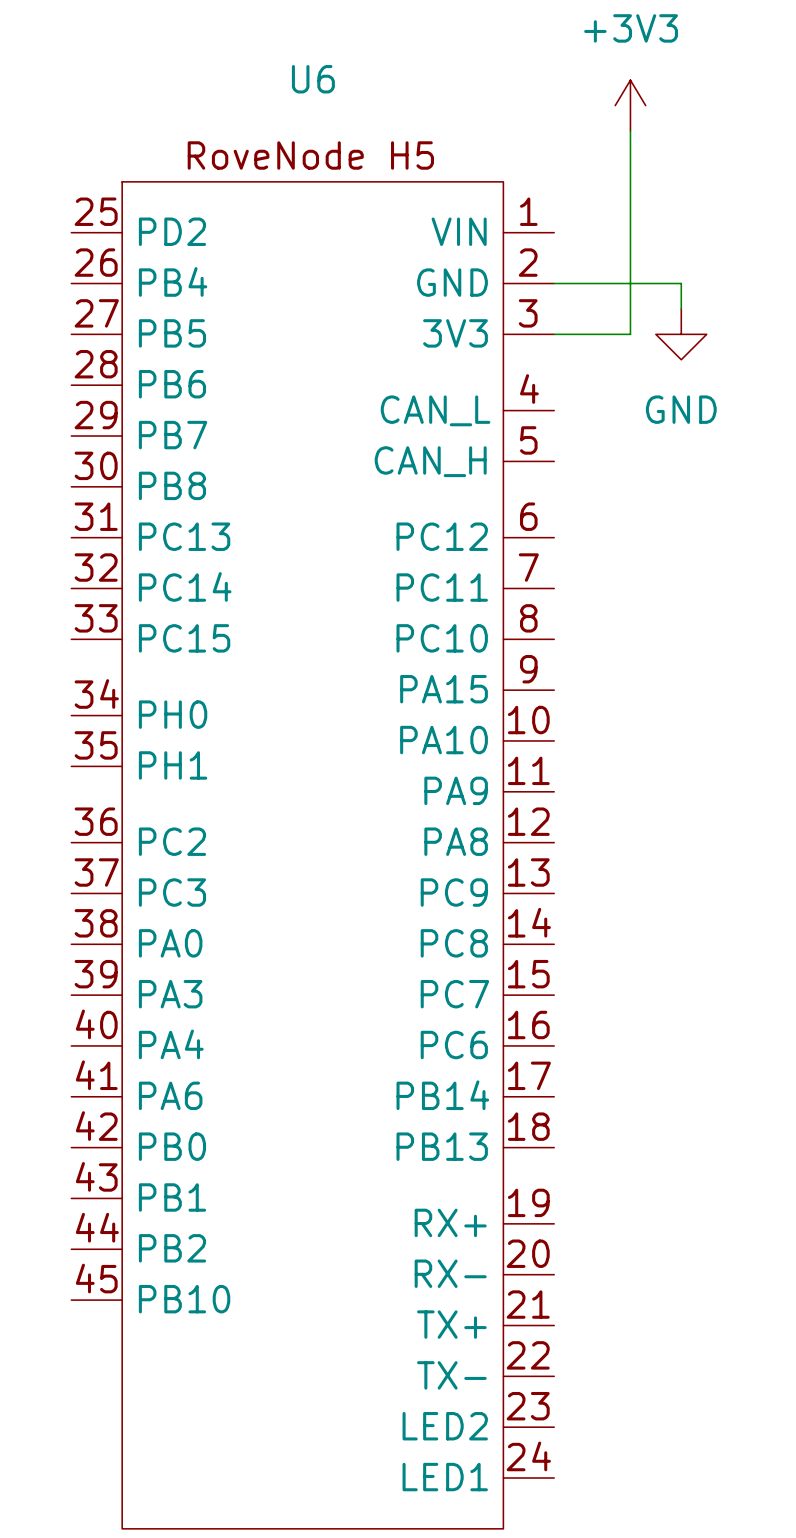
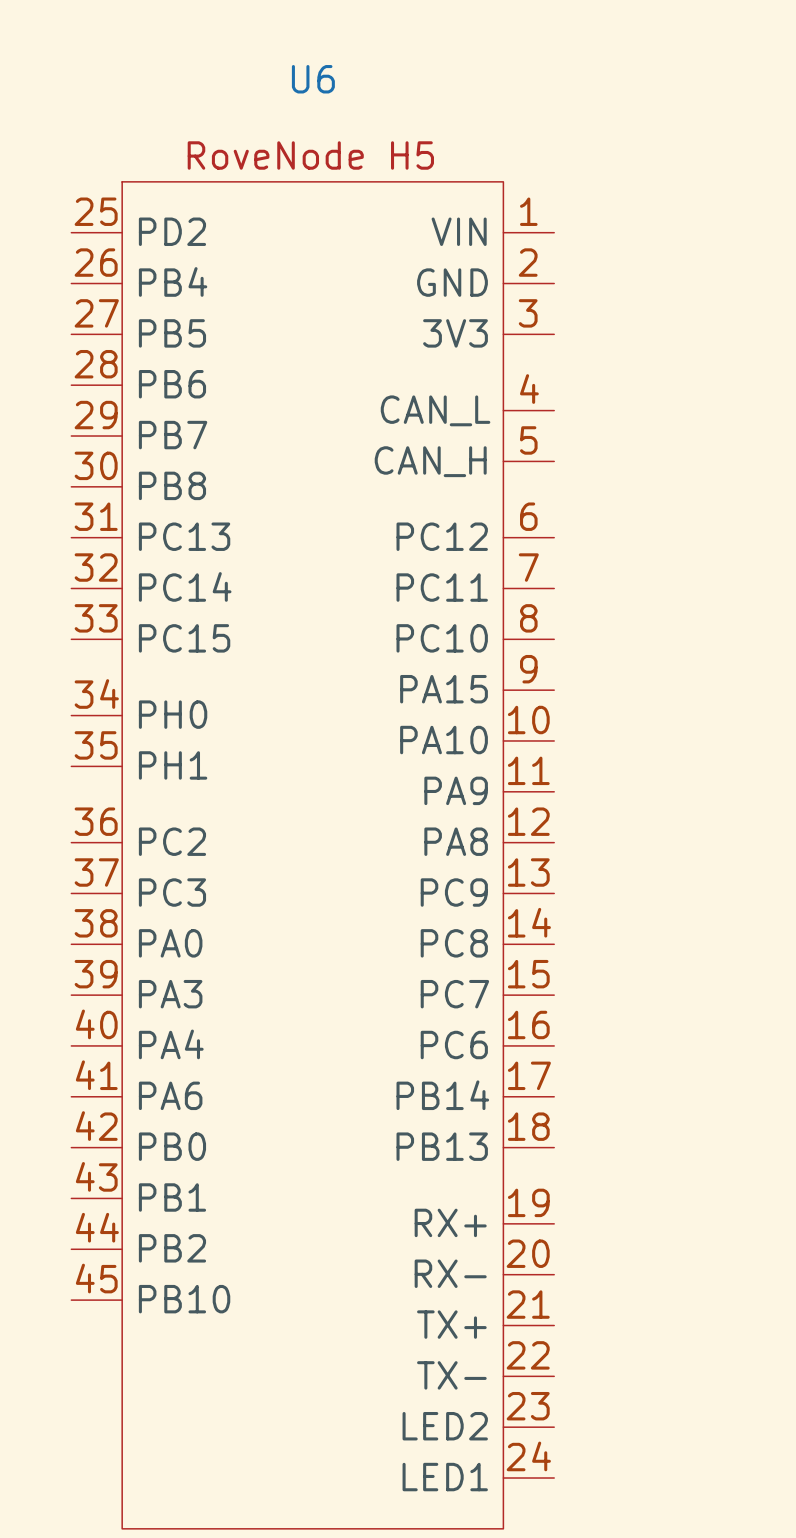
power symbol: +3V3 (630, 105) -> none
wire: (630, 131) (630, 334) (554, 334) -> none
wire: (554, 283) (681, 283) (681, 308) -> none
power symbol: GND (681, 334) -> none

